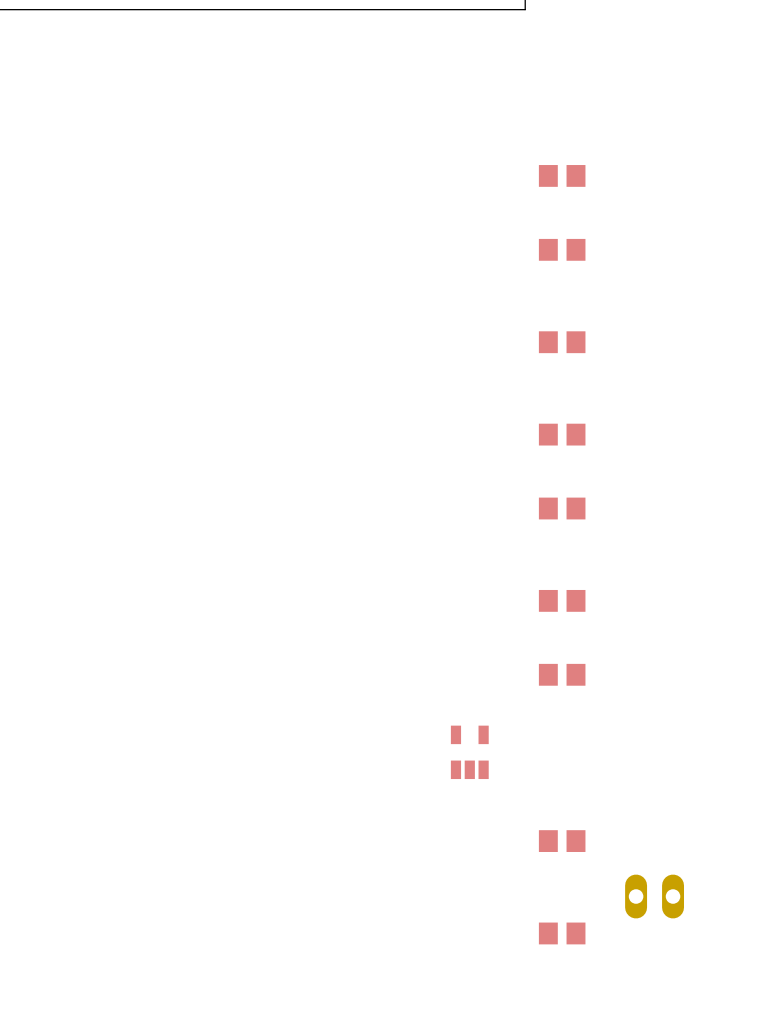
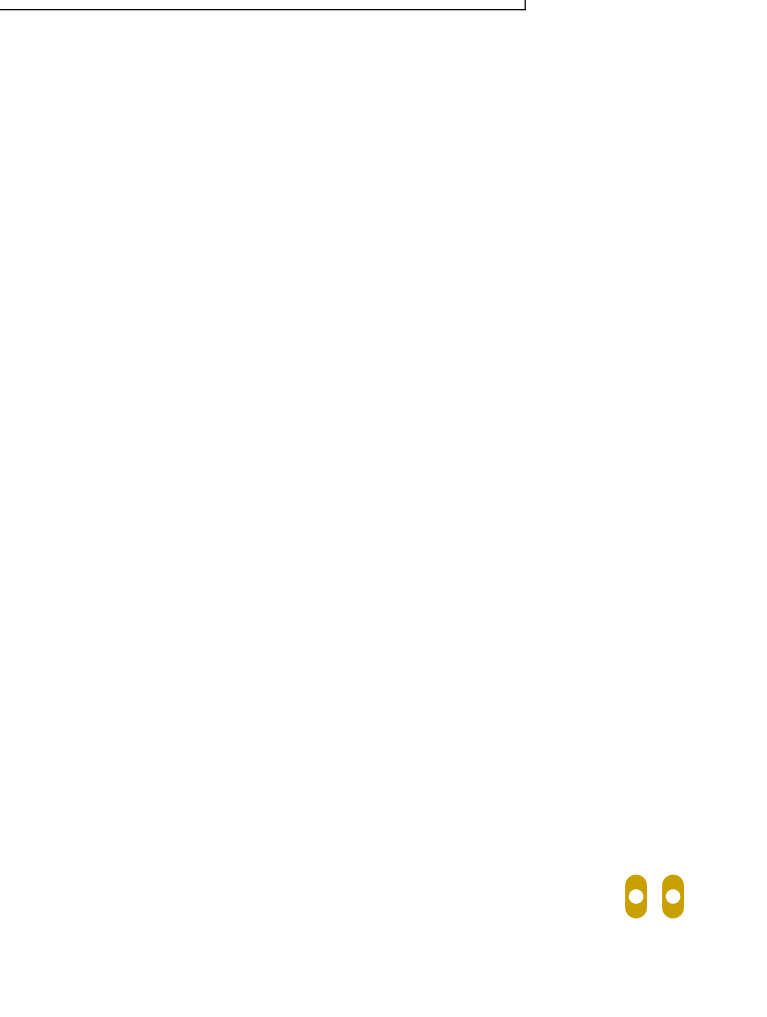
part: (562, 175) -> none
part: (562, 249) -> none
part: (562, 342) -> none
part: (562, 434) -> none
part: (562, 508) -> none
part: (562, 600) -> none
part: (562, 674) -> none
part: (469, 752) -> none
part: (562, 841) -> none
part: (562, 933) -> none

